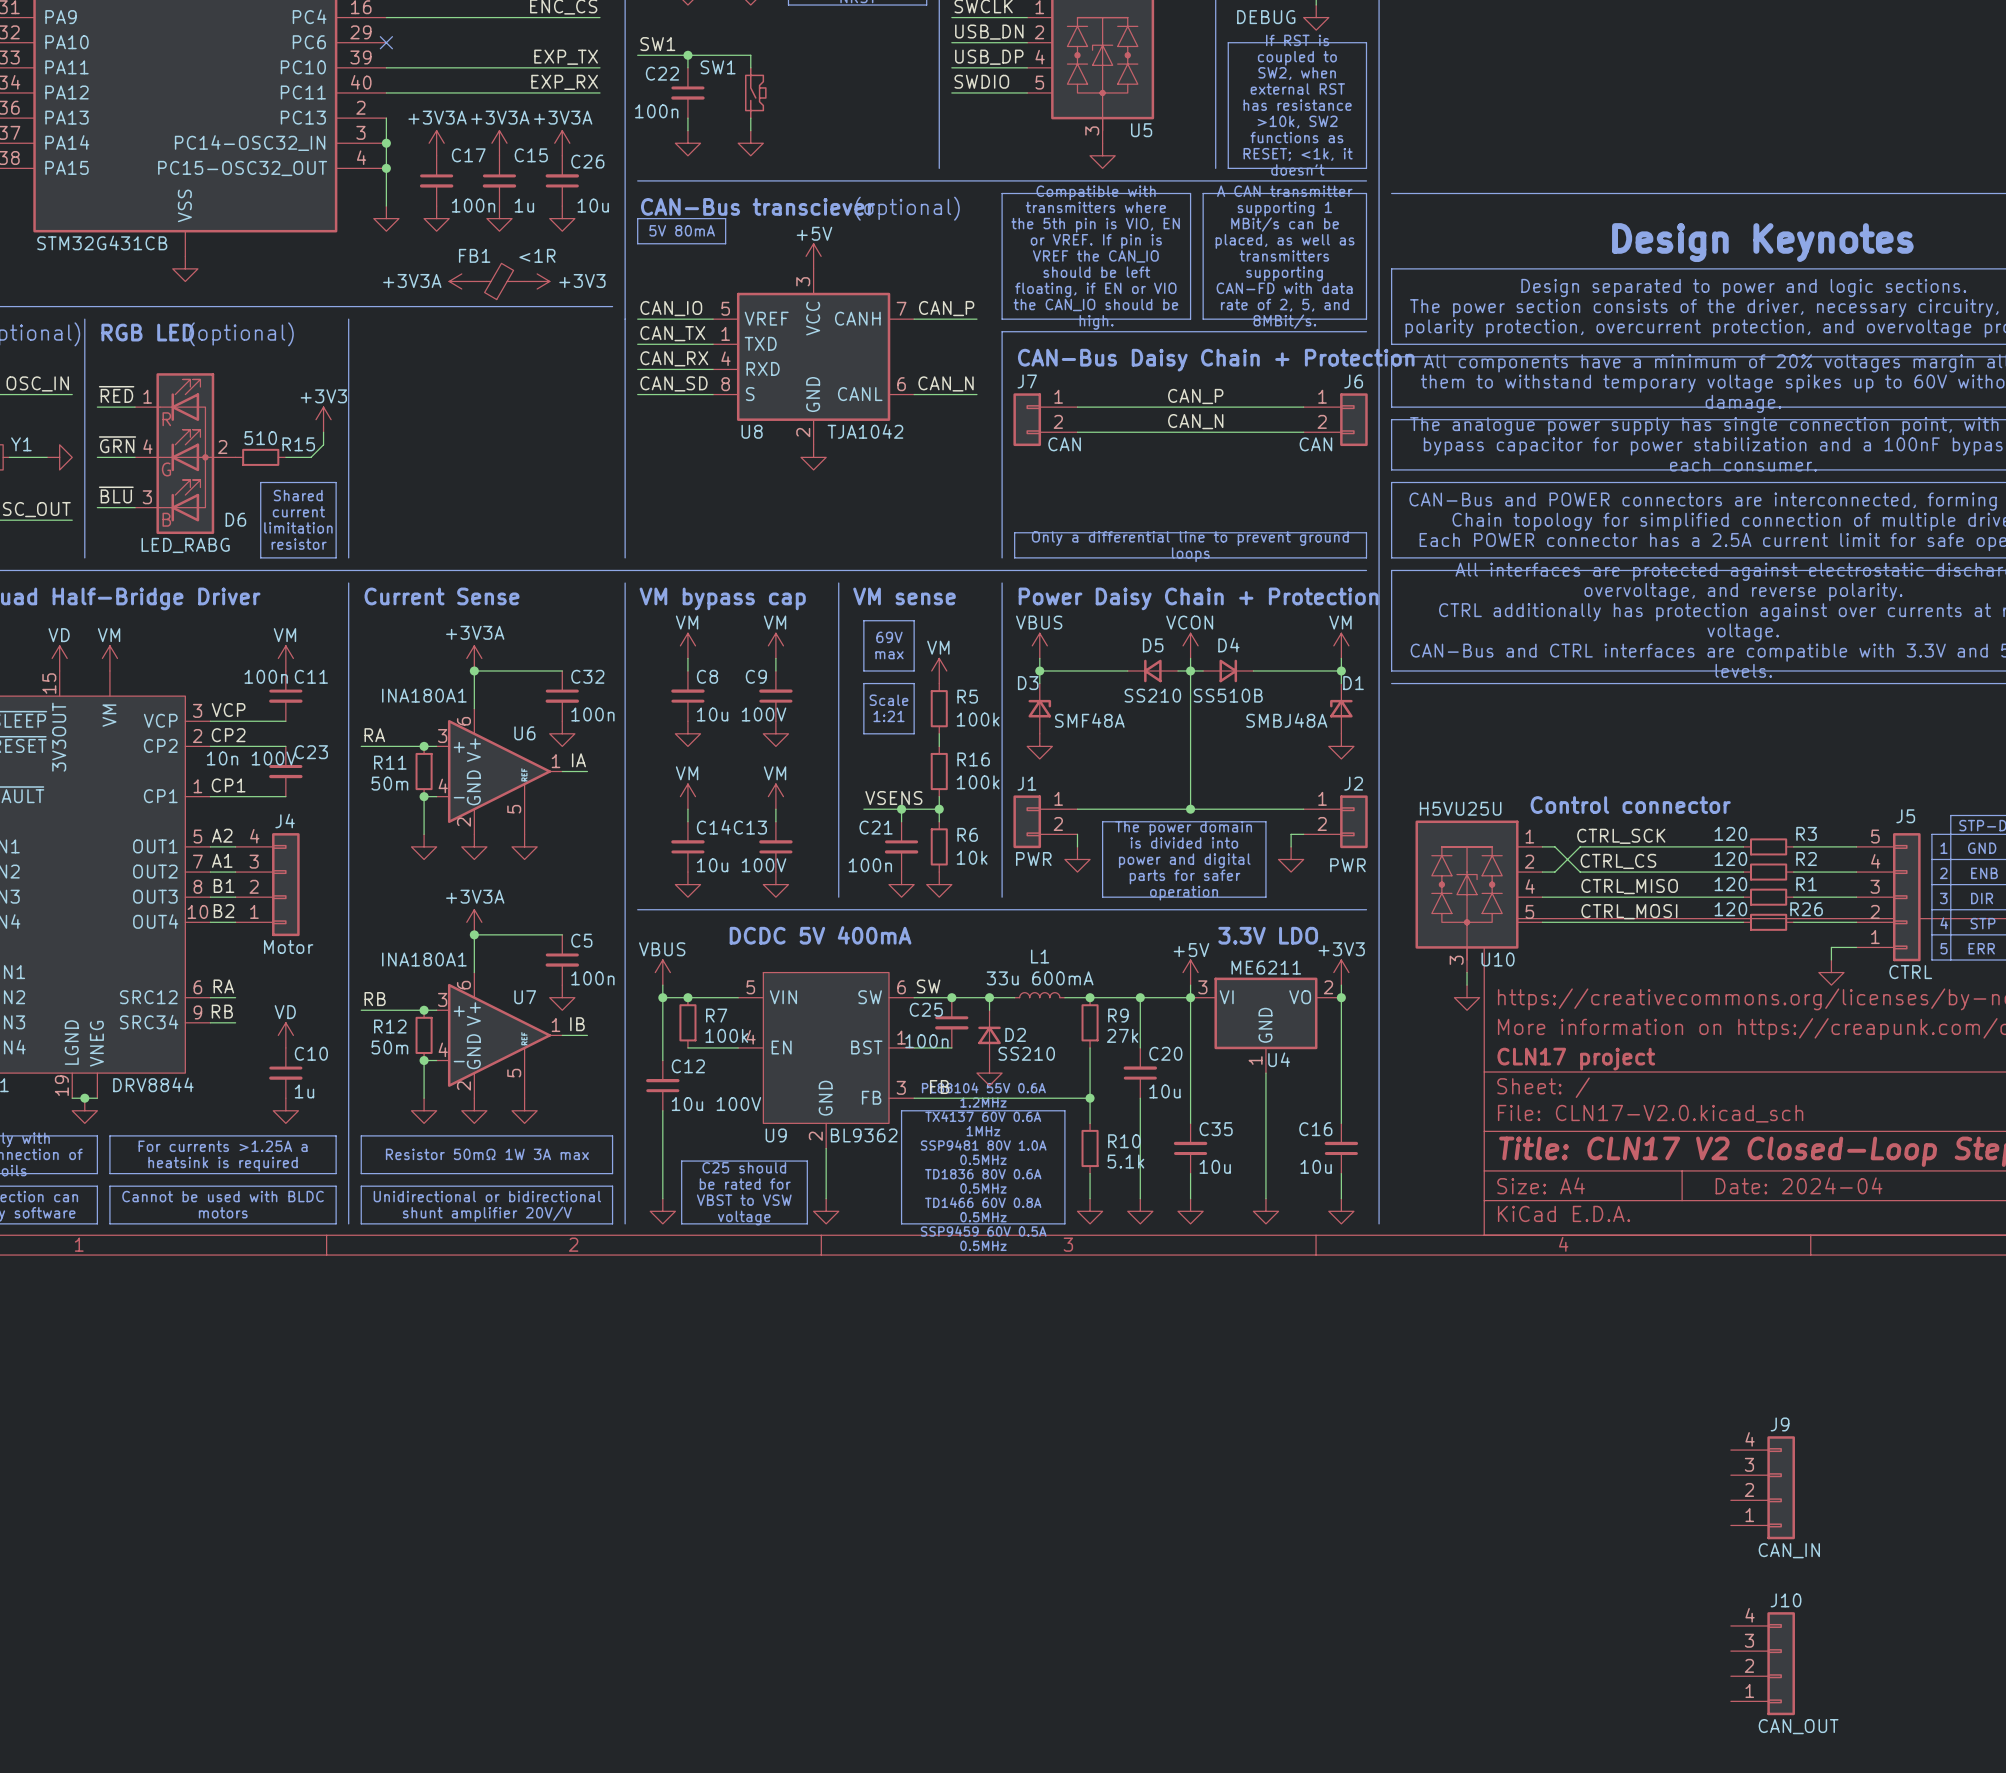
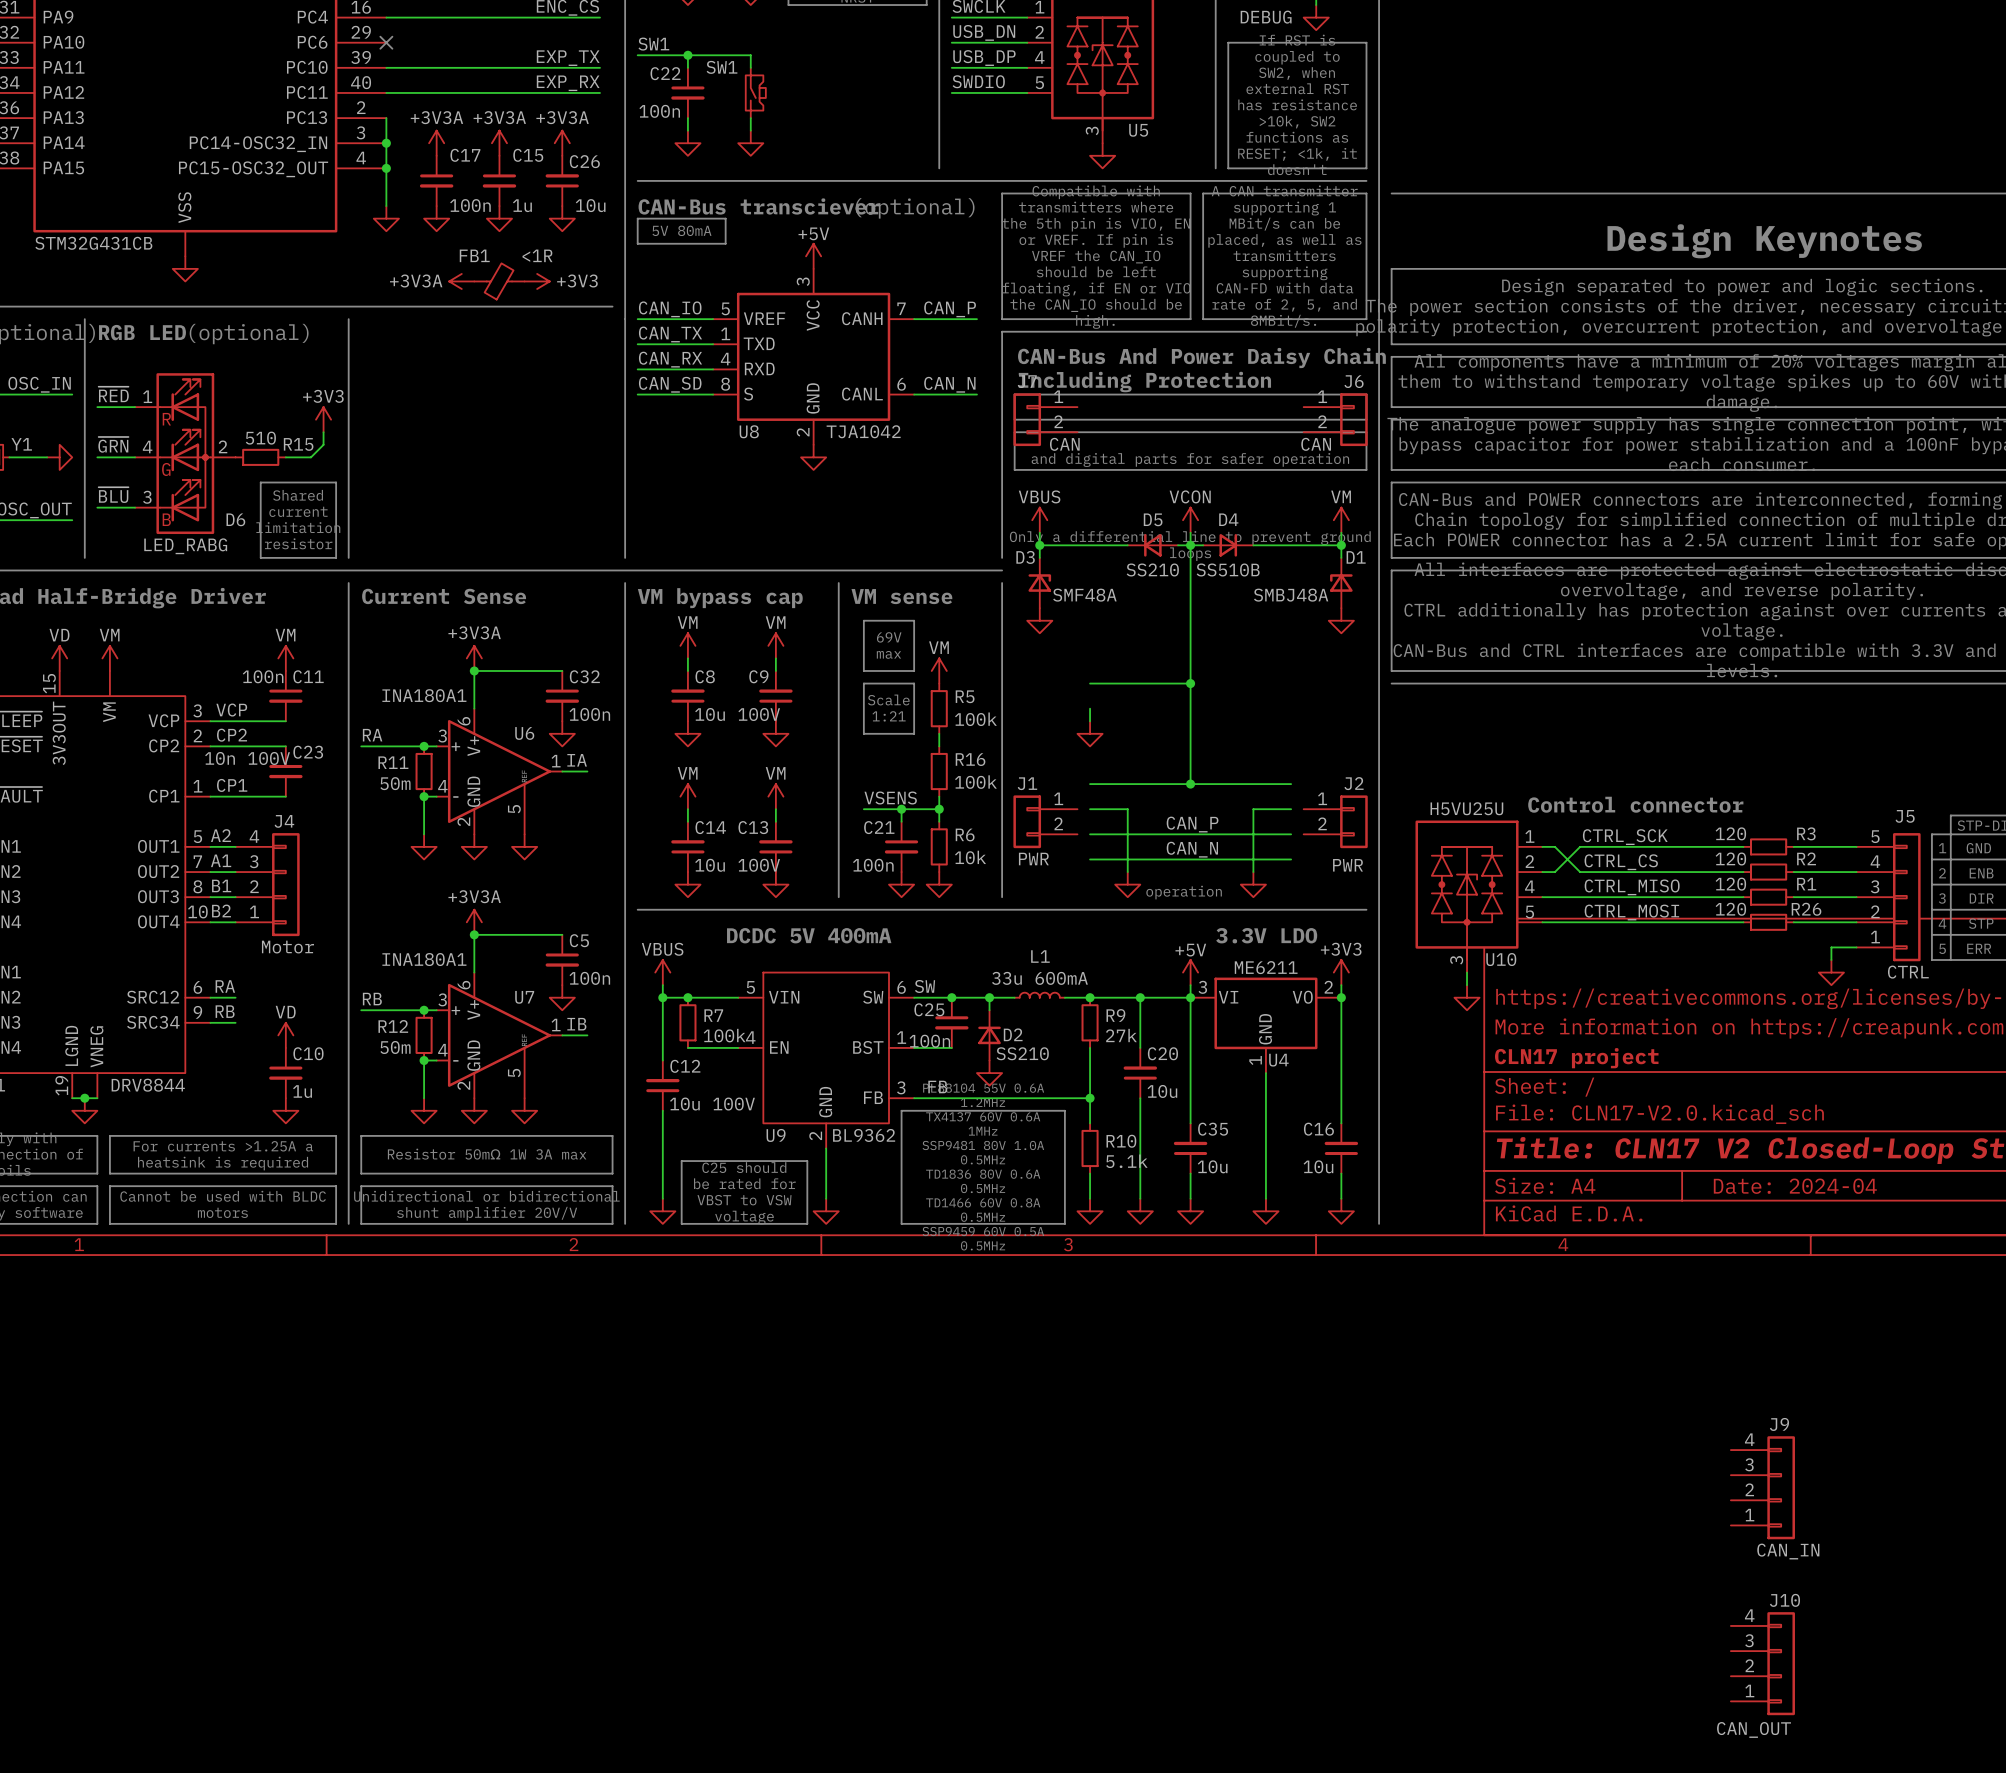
text: CAN-Bus Daisy Chain + Protection (1216, 360) -> CAN-Bus And Power Daisy Chain (1201, 357)
text: none -> Including Protection (1144, 382)
label: CAN_P (1195, 396) -> none
wire: (1077, 407) (1303, 407) -> none
label: CAN_N (1195, 421) -> none
line: none -> (1014, 432) (1014, 469) (1366, 469) (1366, 432) (1014, 432)
text: none -> and digital parts for safer operation (1190, 459)
line: (1014, 532) (1366, 532) (1366, 557) (1014, 557) (1014, 532) -> (1014, 394) (1366, 394) (1366, 419) (1014, 419) (1014, 394)
wire: none -> (1190, 532) (1190, 658)
junction: none -> (1039, 545)
junction: none -> (1190, 545)
junction: none -> (1341, 545)
line: (1002, 570) (1366, 570) -> none
text: Power Daisy Chain + Protection (1198, 598) -> none
power symbol: none -> (1039, 620)
power symbol: none -> (1341, 620)
power symbol position: VBUS (1039, 645) -> VBUS (1039, 520)
power symbol position: VCON (1190, 645) -> VCON (1190, 520)
power symbol position: VM (1341, 645) -> VM (1341, 520)
wire: (1039, 658) (1039, 683) -> (1039, 532) (1039, 557)
wire: (1341, 658) (1341, 683) -> (1341, 532) (1341, 557)
wire: (1039, 670) (1127, 670) -> (1039, 545) (1127, 545)
junction: (1039, 670) -> none
D5 position: (1152, 670) -> (1152, 545)
wire: (1178, 670) (1203, 670) -> (1178, 545) (1203, 545)
junction position: (1190, 670) -> (1190, 683)
D4 position: (1228, 670) -> (1228, 545)
wire: (1253, 670) (1341, 670) -> (1253, 545) (1341, 545)
junction: (1341, 670) -> none
wire: none -> (1090, 683) (1190, 683)
D3 position: (1039, 708) -> (1039, 583)
D1 position: (1341, 708) -> (1341, 583)
power symbol position: (1039, 746) -> (1090, 733)
power symbol: (1341, 746) -> none
wire: none -> (1090, 784) (1291, 784)
wire: (1190, 784) (1190, 809) -> none
wire: (1077, 809) (1090, 809) -> none
wire: (1127, 809) (1253, 809) -> (1127, 809) (1127, 872)
junction position: (1190, 809) -> (1190, 784)
wire: none -> (1253, 809) (1253, 872)
wire: (1291, 809) (1303, 809) -> none
line: (1102, 821) (1265, 821) (1265, 897) (1102, 897) (1102, 821) -> none
label: none -> CAN_P (1192, 824)
text: The power domain (1183, 828) -> none
wire: (1077, 834) (1077, 846) -> (1090, 708) (1090, 721)
wire: none -> (1090, 834) (1291, 834)
wire: (1303, 834) (1291, 834) (1291, 846) -> none
text: is divided into (1184, 842) -> none
label: none -> CAN_N (1192, 849)
power symbol position: (1077, 859) -> (1127, 884)
wire: none -> (1090, 859) (1291, 859)
power symbol position: (1291, 859) -> (1253, 884)
text: power and digital (1184, 860) -> none
text: parts for safer (1185, 876) -> none
J10 value position: CAN_OUT (1798, 1726) -> CAN_OUT (1754, 1729)

